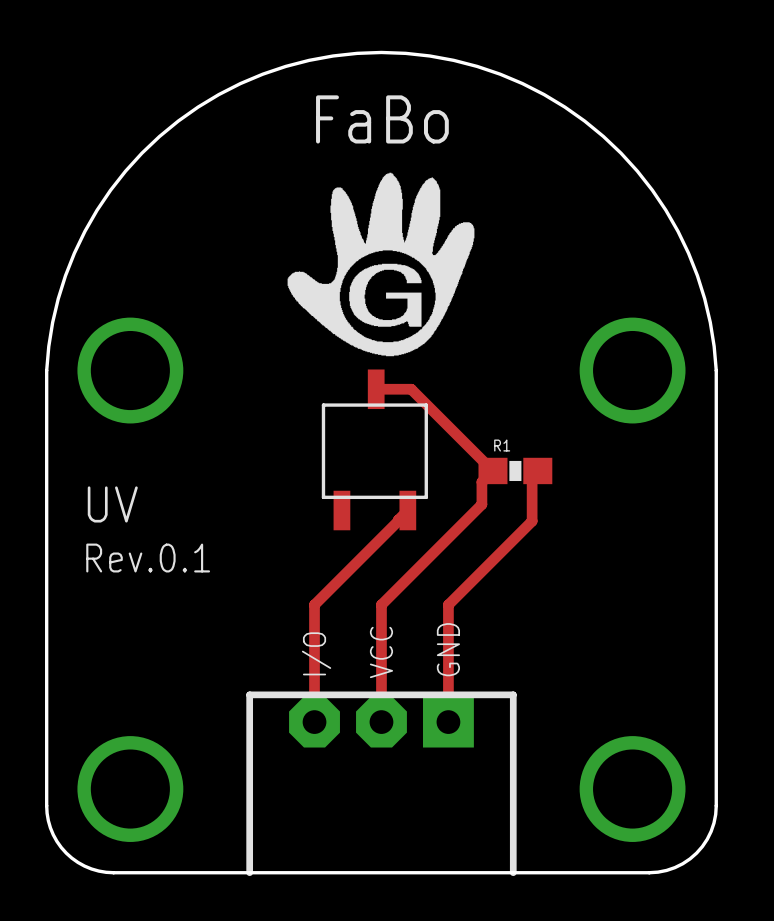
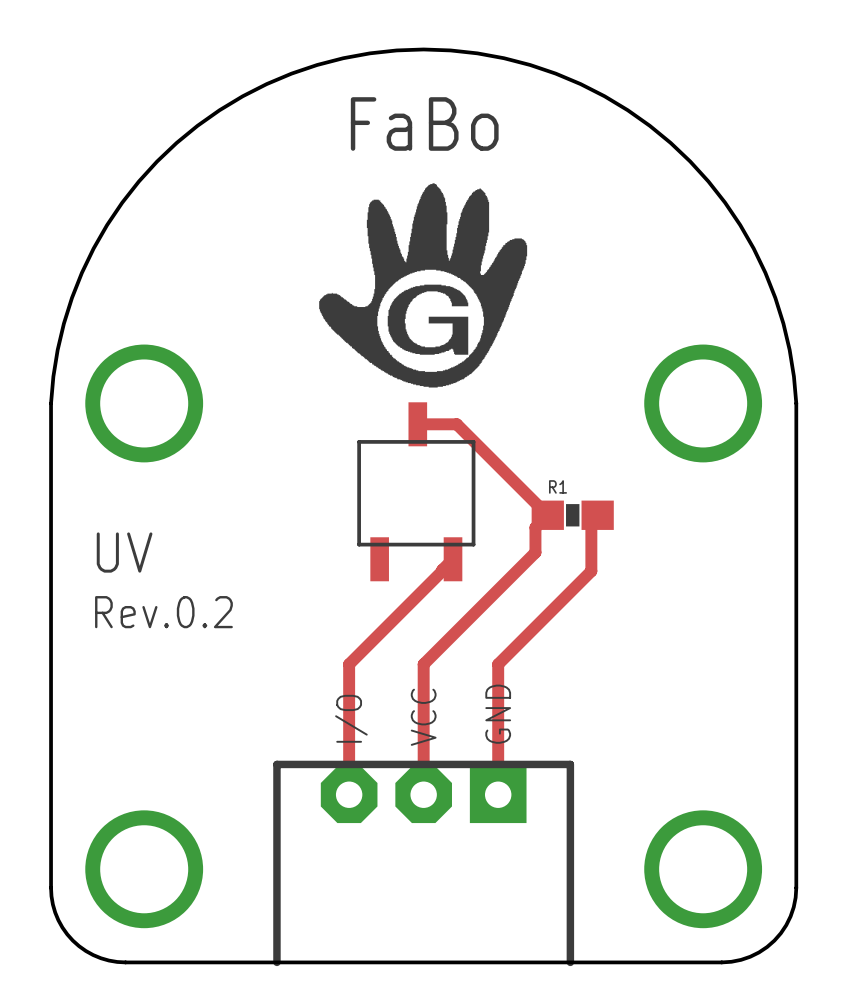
text: Rev.0.1 (148, 558) -> Rev.0.2 (163, 612)

